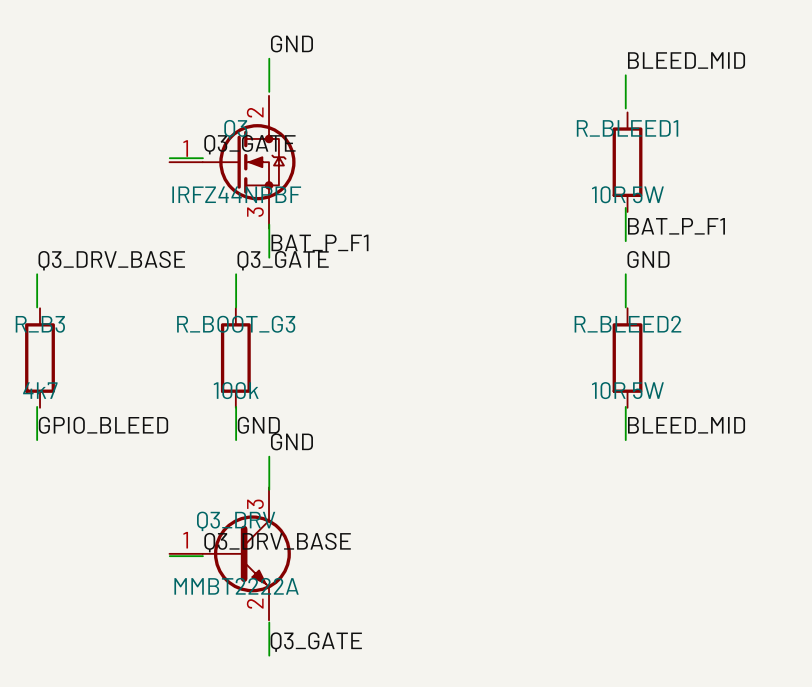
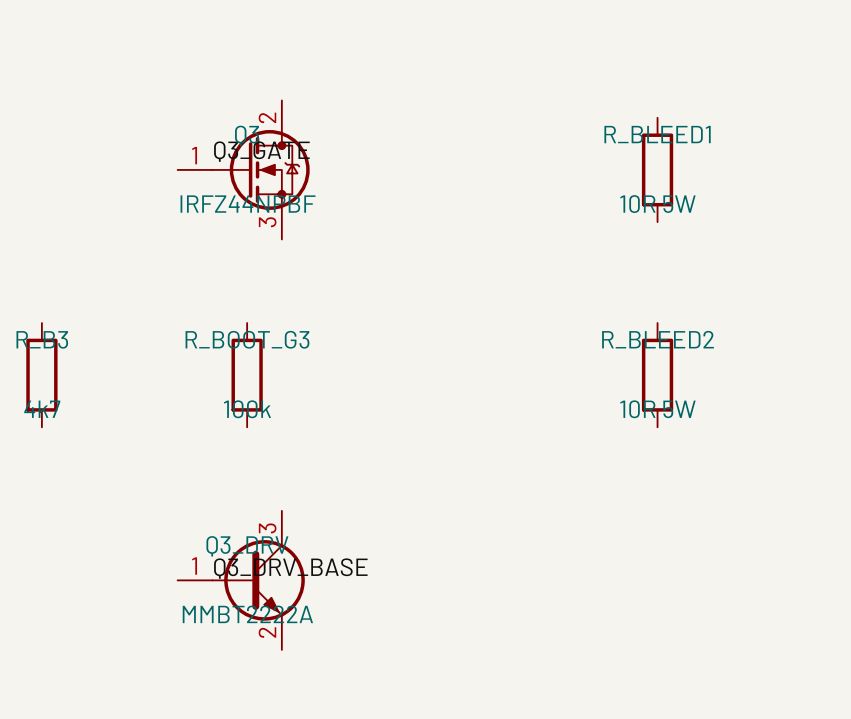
label: GND (291, 43) -> none
wire: (269, 58) (269, 91) -> none
label: BLEED_MID (686, 60) -> none
wire: (625, 75) (625, 108) -> none
wire: (169, 158) (202, 158) -> none
wire: (625, 207) (625, 241) -> none
wire: (269, 224) (269, 257) -> none
label: BAT_P_F1 (676, 226) -> none
label: BAT_P_F1 (319, 242) -> none
label: GND (648, 259) -> none
label: Q3_DRV_BASE (111, 260) -> none
label: Q3_GATE (283, 260) -> none
wire: (37, 274) (37, 307) -> none
wire: (236, 274) (236, 307) -> none
wire: (625, 274) (625, 307) -> none
wire: (37, 406) (37, 440) -> none
wire: (236, 406) (236, 440) -> none
wire: (625, 406) (625, 440) -> none
label: GPIO_BLEED (103, 425) -> none
label: GND (258, 425) -> none
label: BLEED_MID (686, 425) -> none
label: GND (291, 441) -> none
wire: (269, 456) (269, 489) -> none
wire: (169, 556) (202, 556) -> none
wire: (269, 622) (269, 655) -> none
label: Q3_GATE (316, 642) -> none

